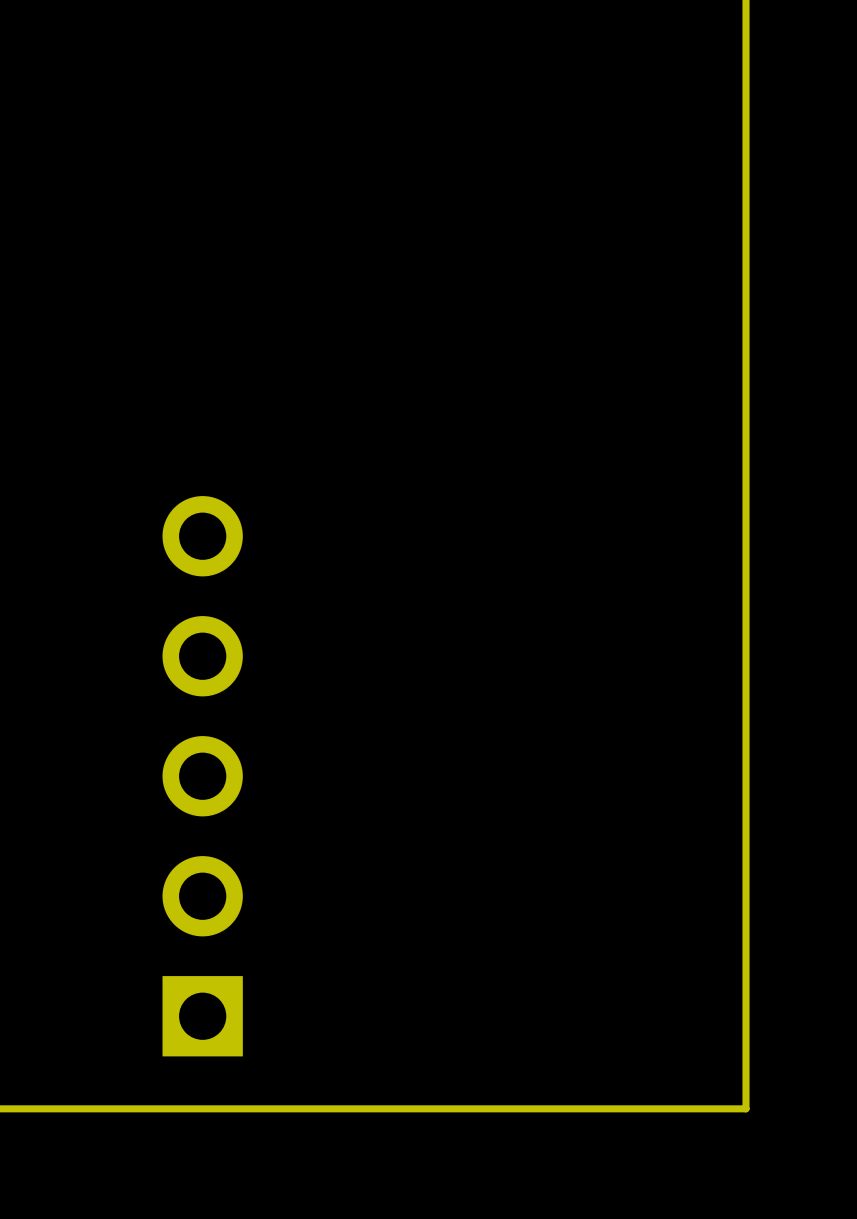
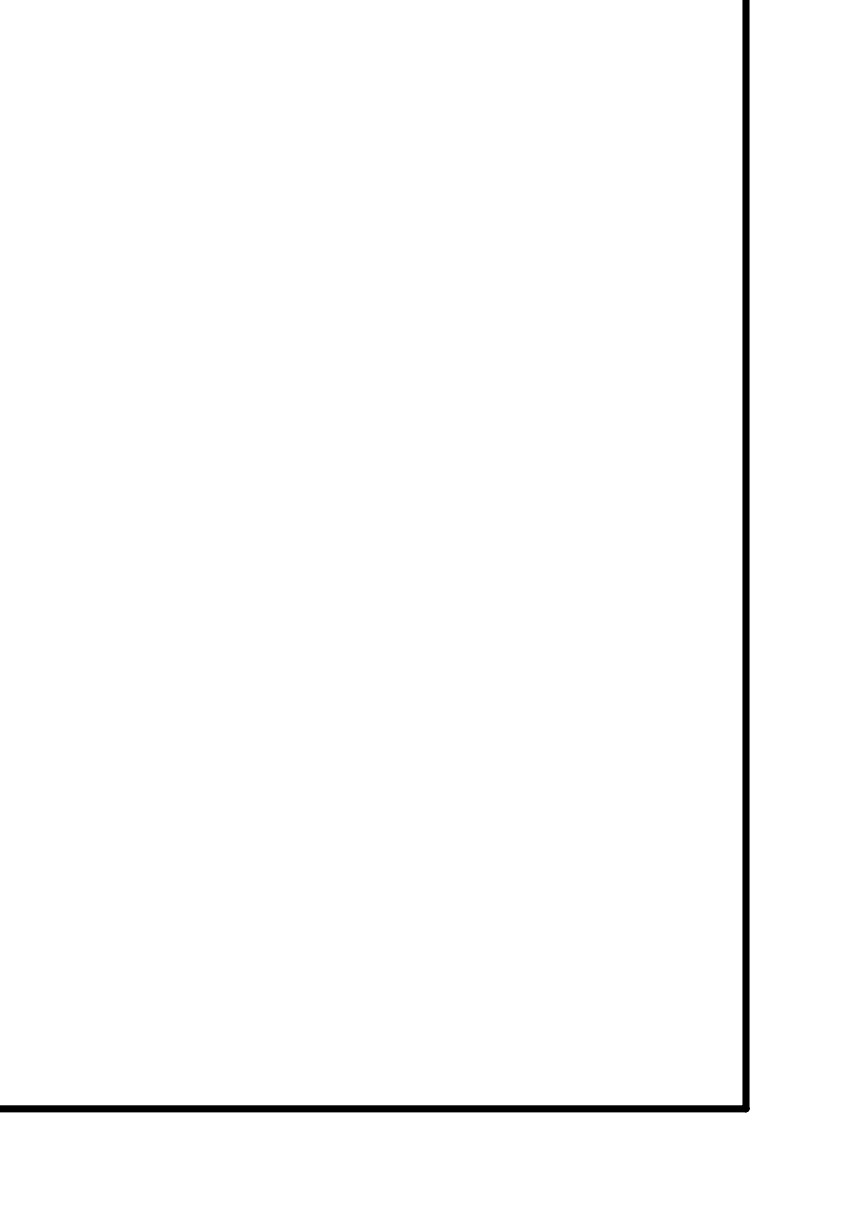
part: (202, 776) -> none

